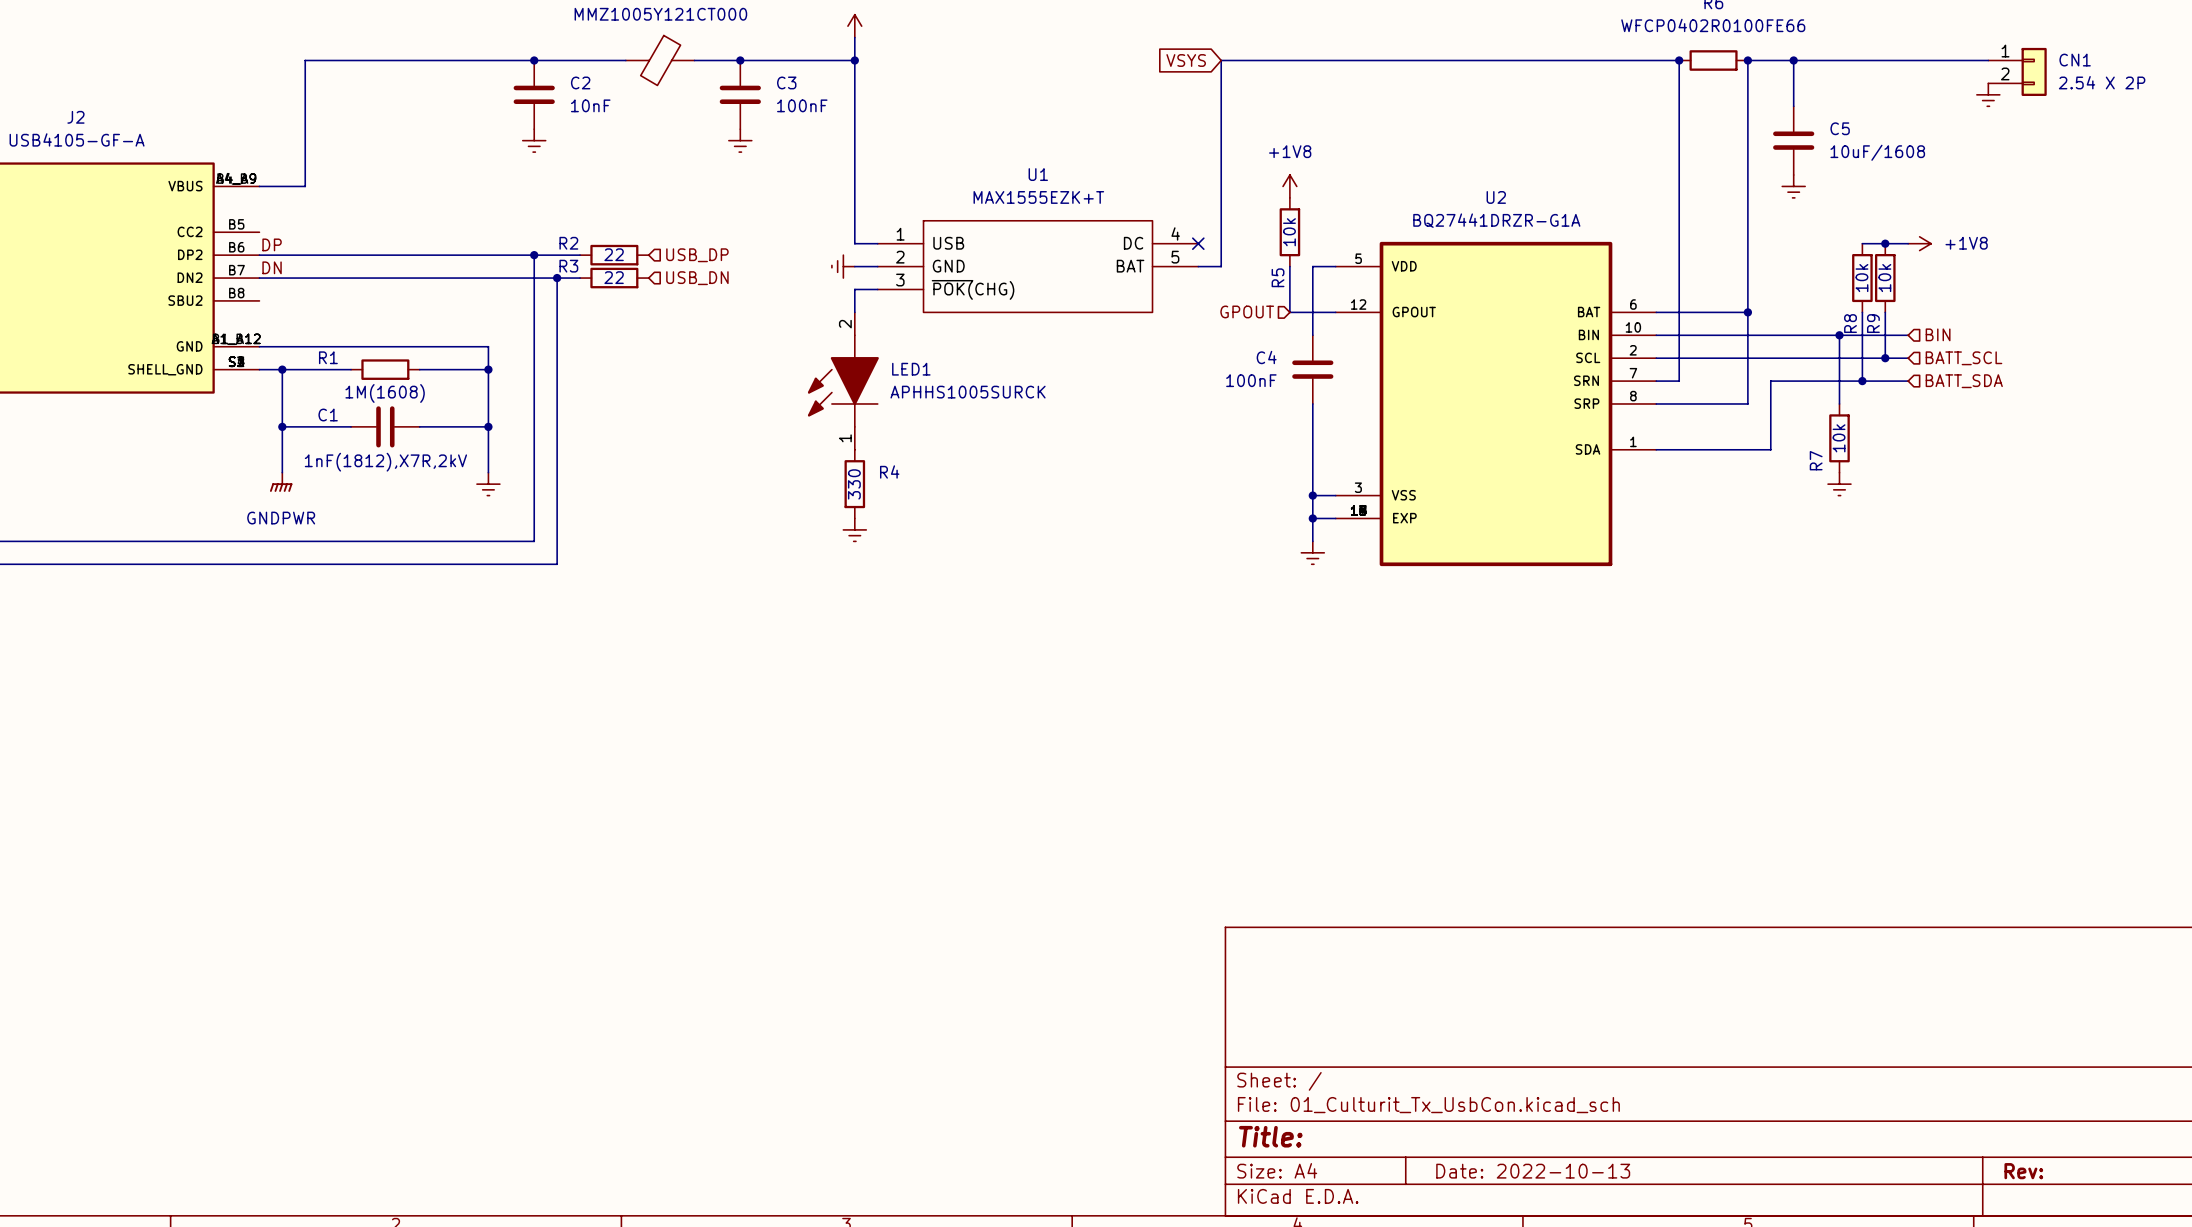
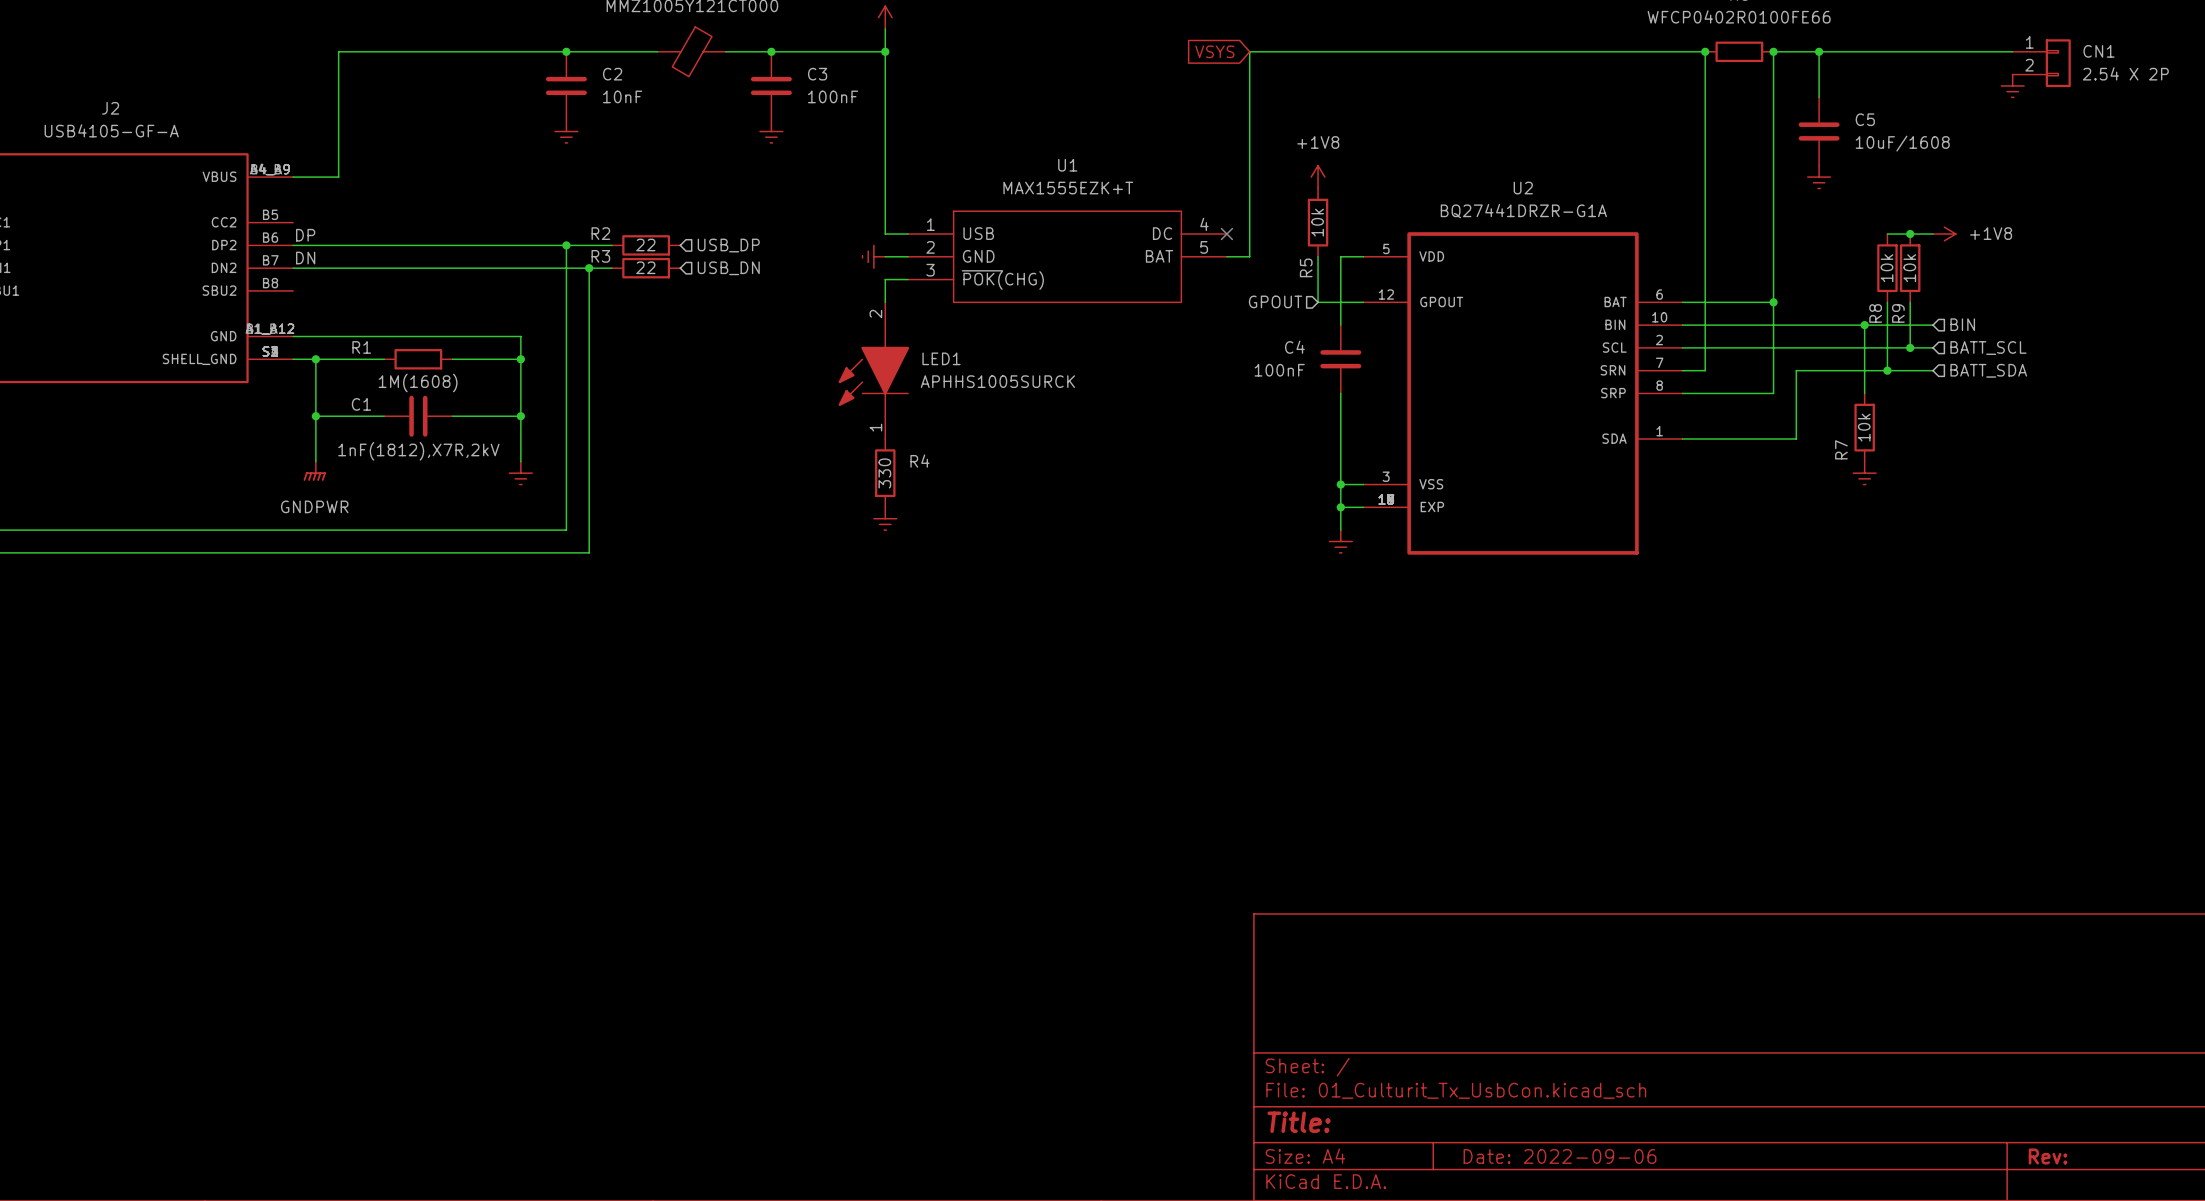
title block: Date: 2022-10-13 (1533, 1171) -> Date: 2022-09-06 (1560, 1156)

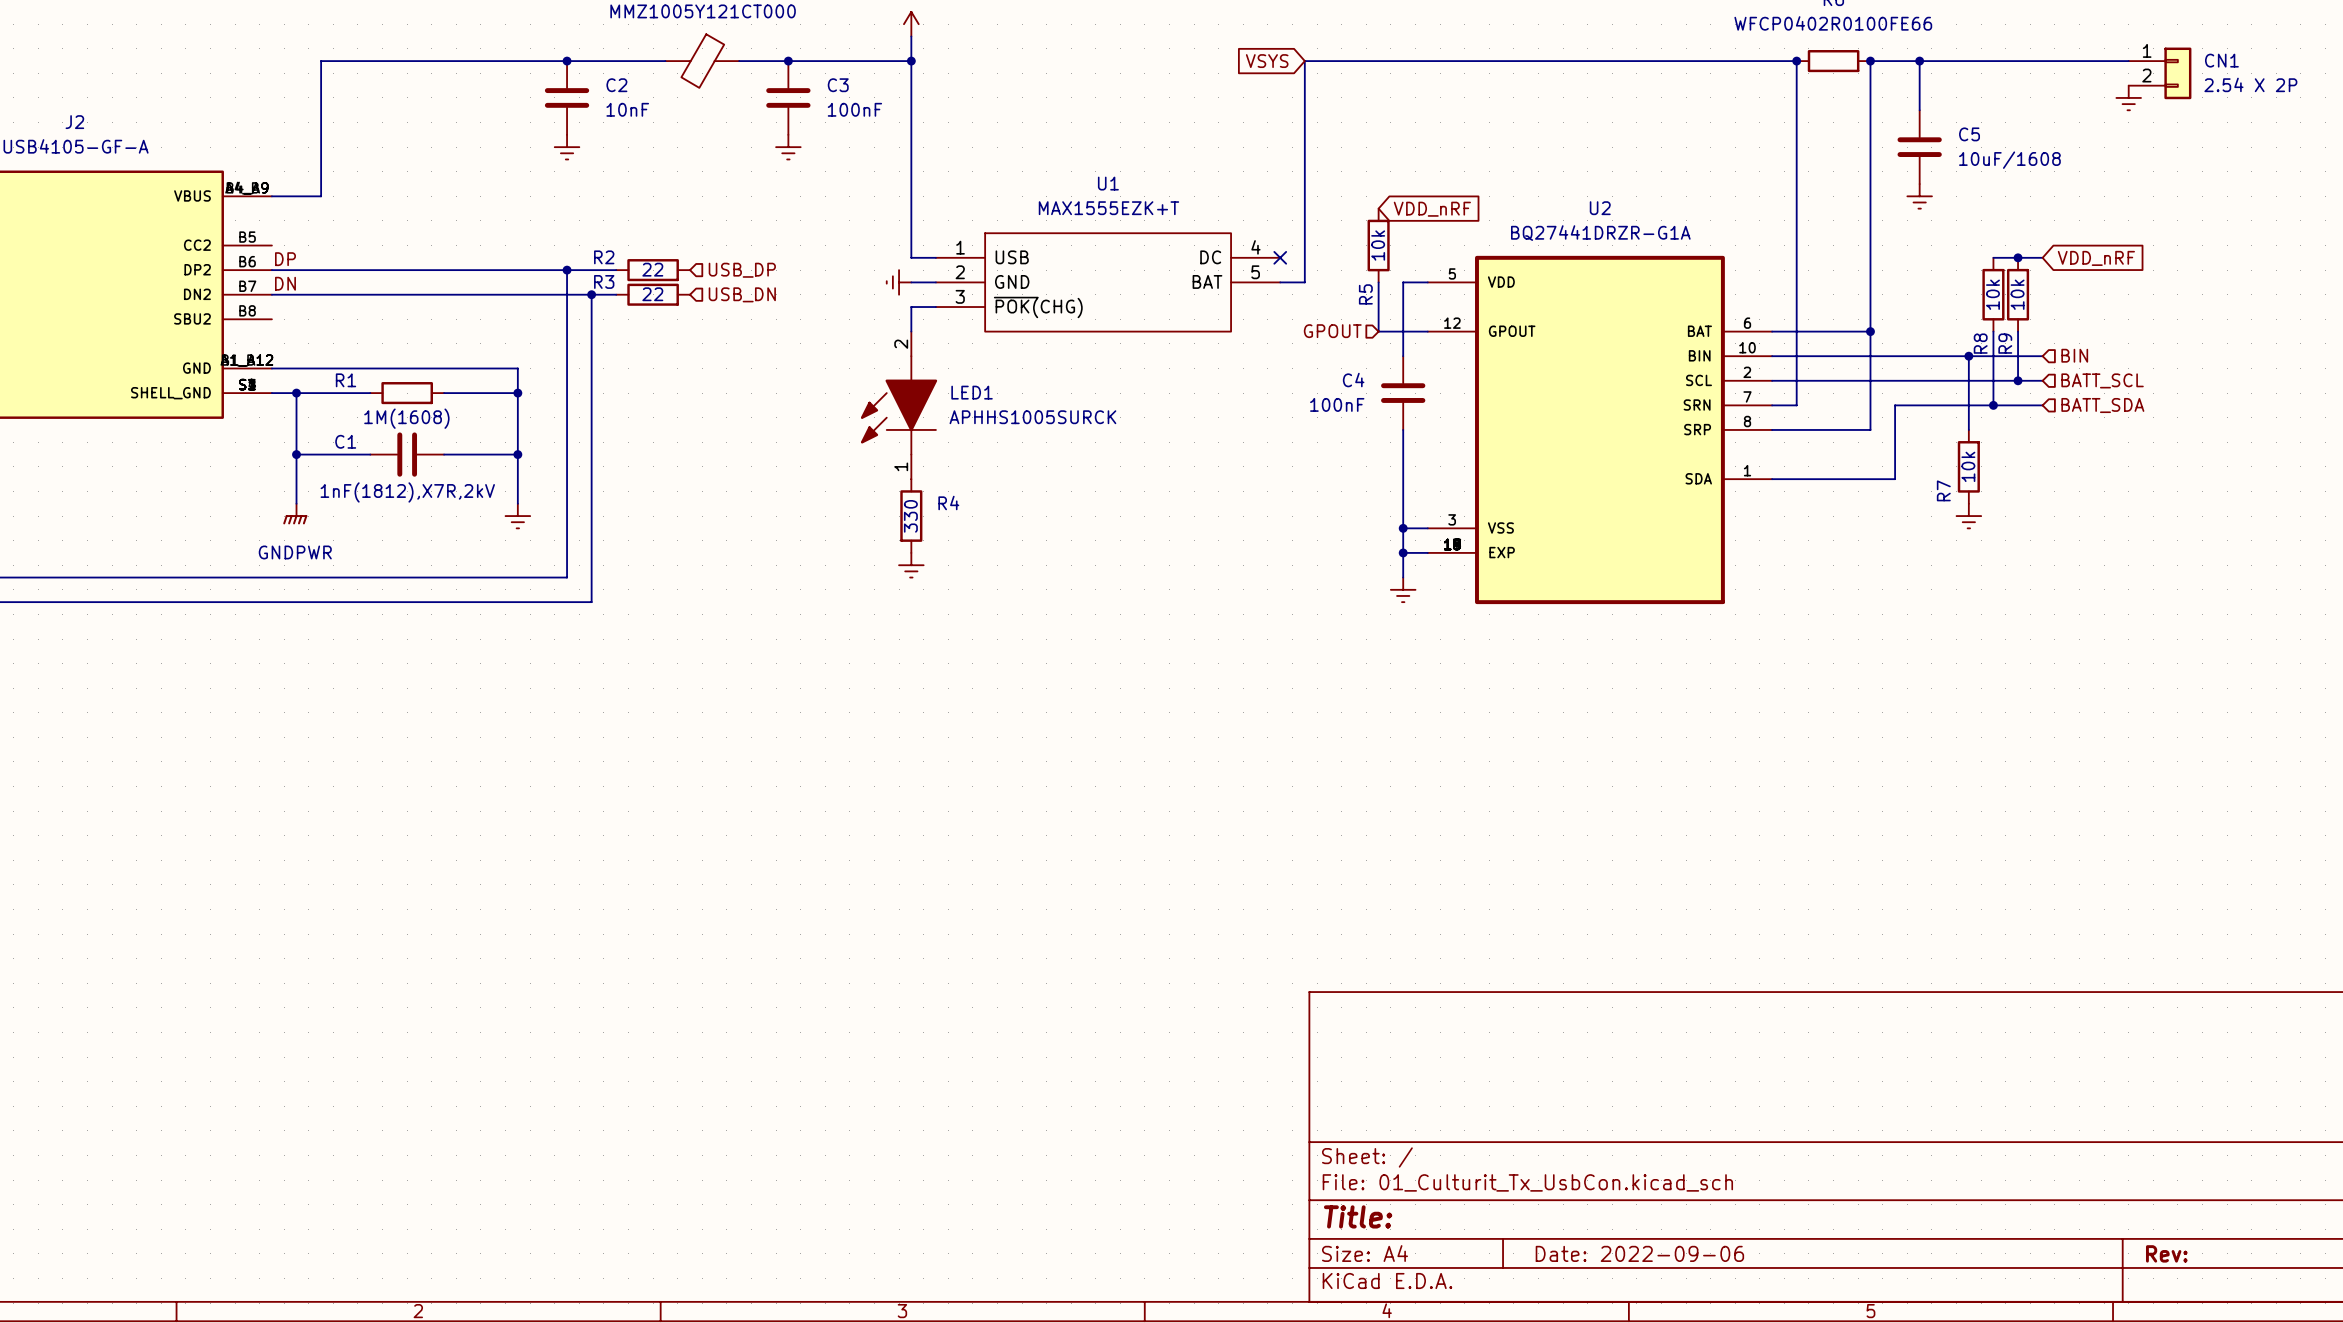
power symbol: +1V8 (1318, 177) -> none
global label: none -> VDD_nRF (1432, 209)
power symbol: +1V8 (1944, 234) -> none
global label: none -> VDD_nRF (2096, 258)

